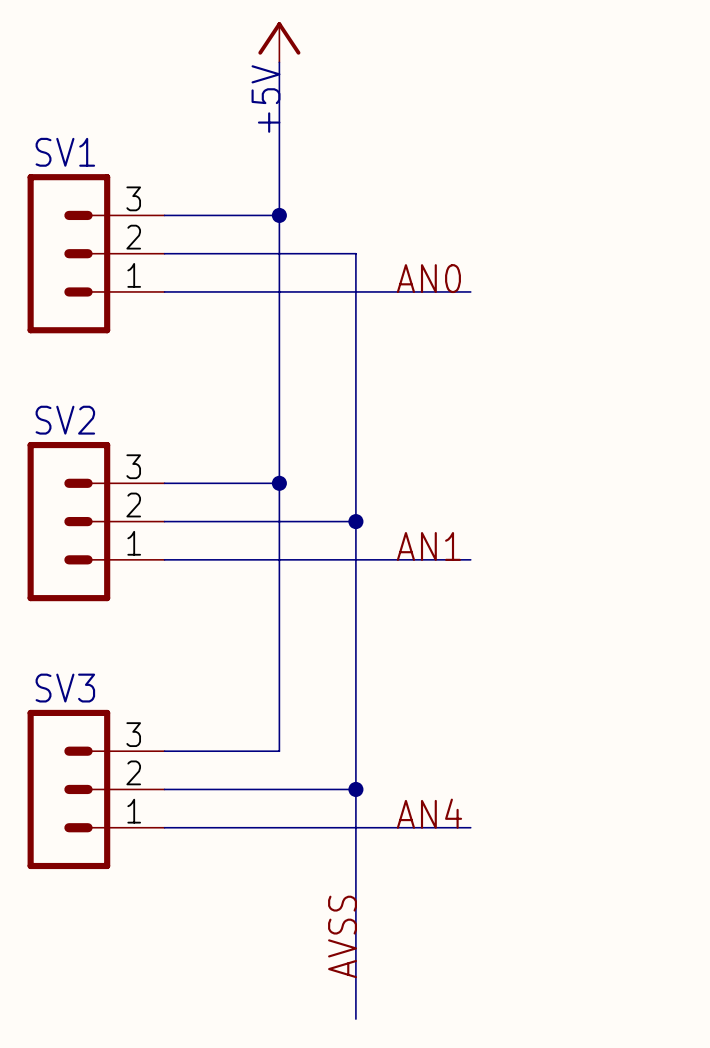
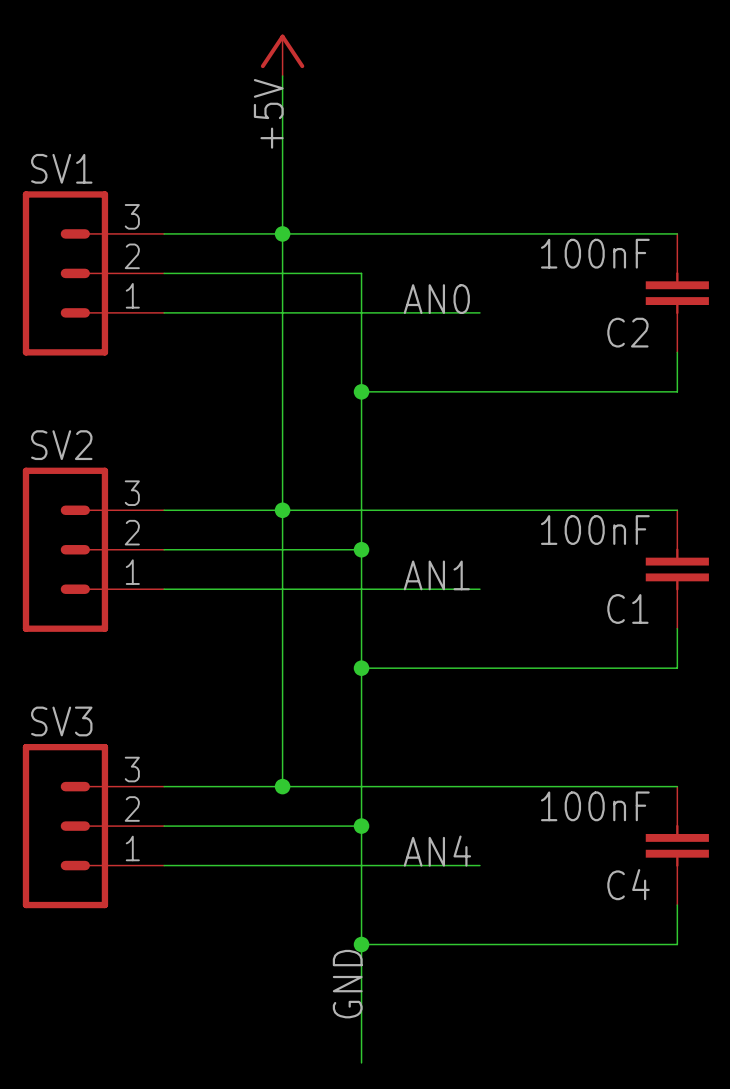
wire: none -> (282, 233) (677, 233)
C2: none -> 100nF (677, 293)
wire: none -> (677, 352) (677, 391) (361, 391)
junction: none -> (361, 391)
wire: none -> (282, 510) (677, 510)
C1: none -> 100nF (677, 569)
wire: none -> (677, 628) (677, 668) (361, 668)
junction: none -> (361, 668)
wire: none -> (282, 786) (677, 786)
junction: none -> (282, 786)
C4: none -> 100nF (677, 845)
wire: none -> (677, 905) (677, 944) (361, 944)
junction: none -> (361, 944)
label: AVSS (342, 936) -> GND (347, 984)

